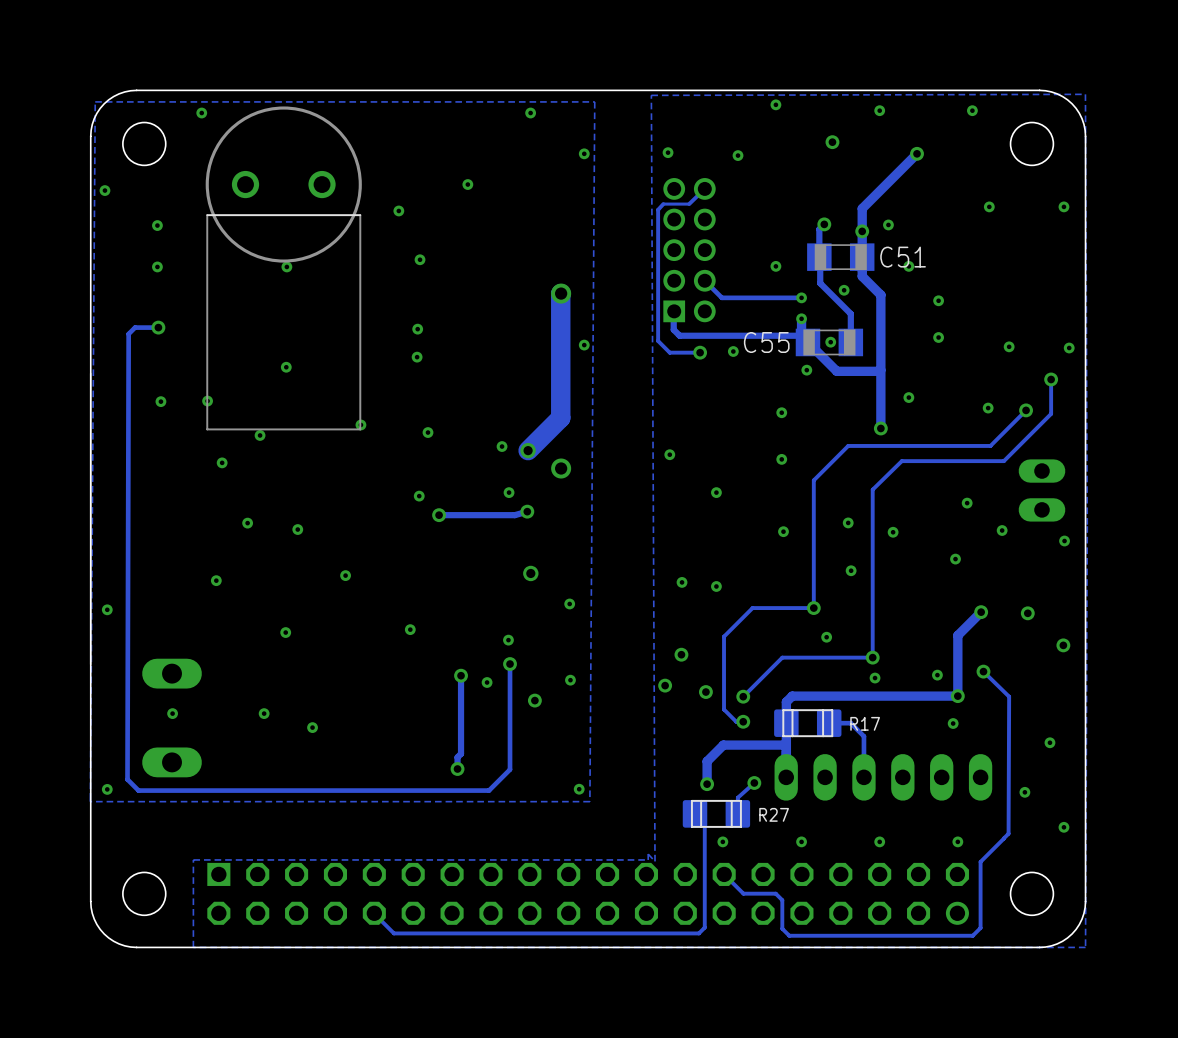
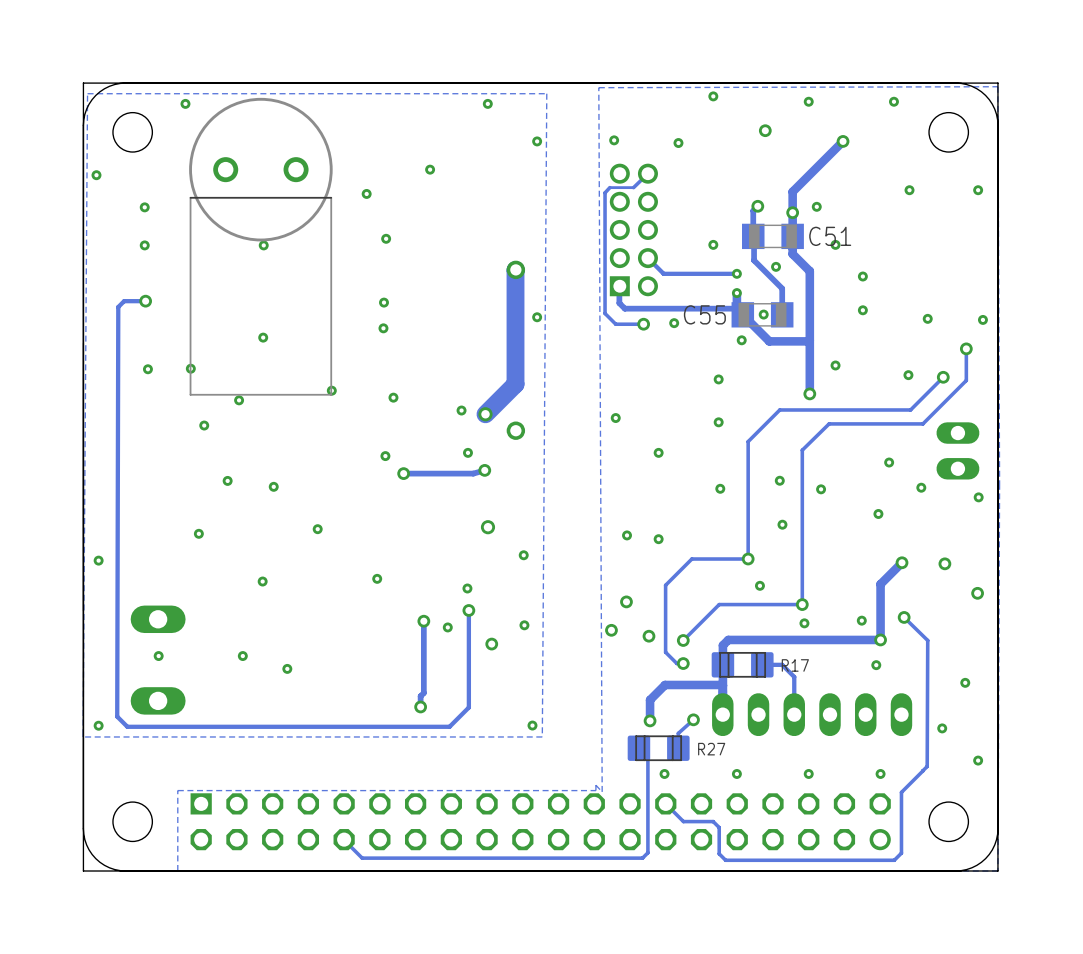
board edge: none -> (997, 83) (83, 83) (83, 871) (997, 871) (997, 83)

